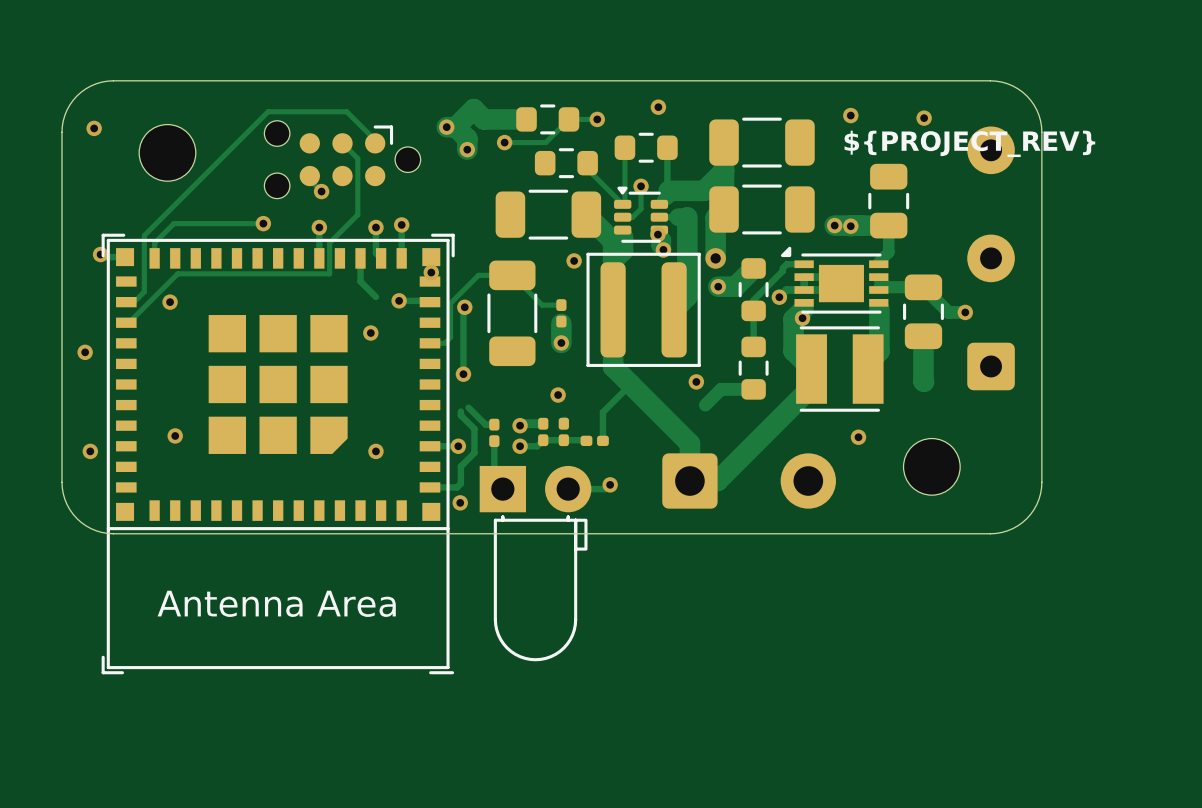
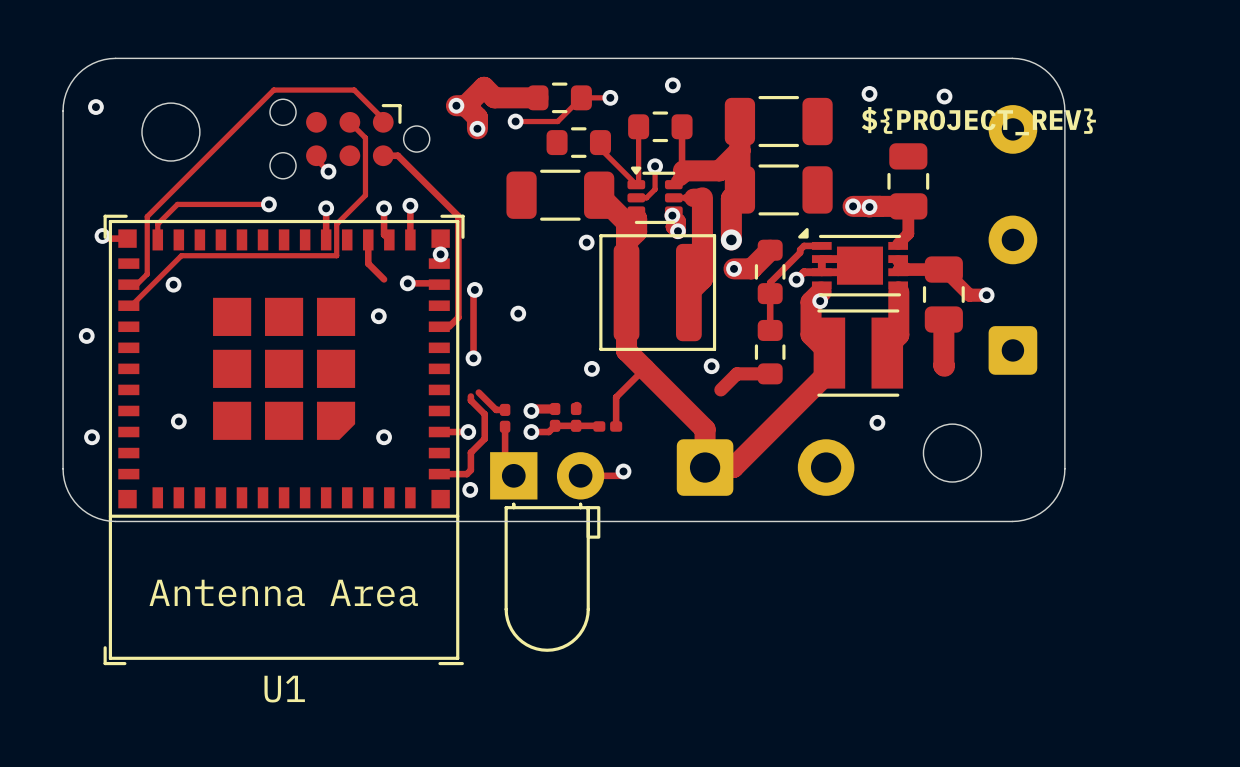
track: (561, 305) (542, 305) (512, 275) (478, 275) (450, 303) (450, 337) (444, 343) (439, 343) -> (383, 155) (397, 155) (458, 216) (458, 317) (449, 326)
part: (512, 313) -> none
part: (561, 313) -> none
track: (561, 323) (561, 342) -> none
via: none -> (518, 313)
via: (561, 342) -> none
via: none -> (591, 368)
via: (558, 395) -> none
U1 name: none -> U1 (284, 689)

